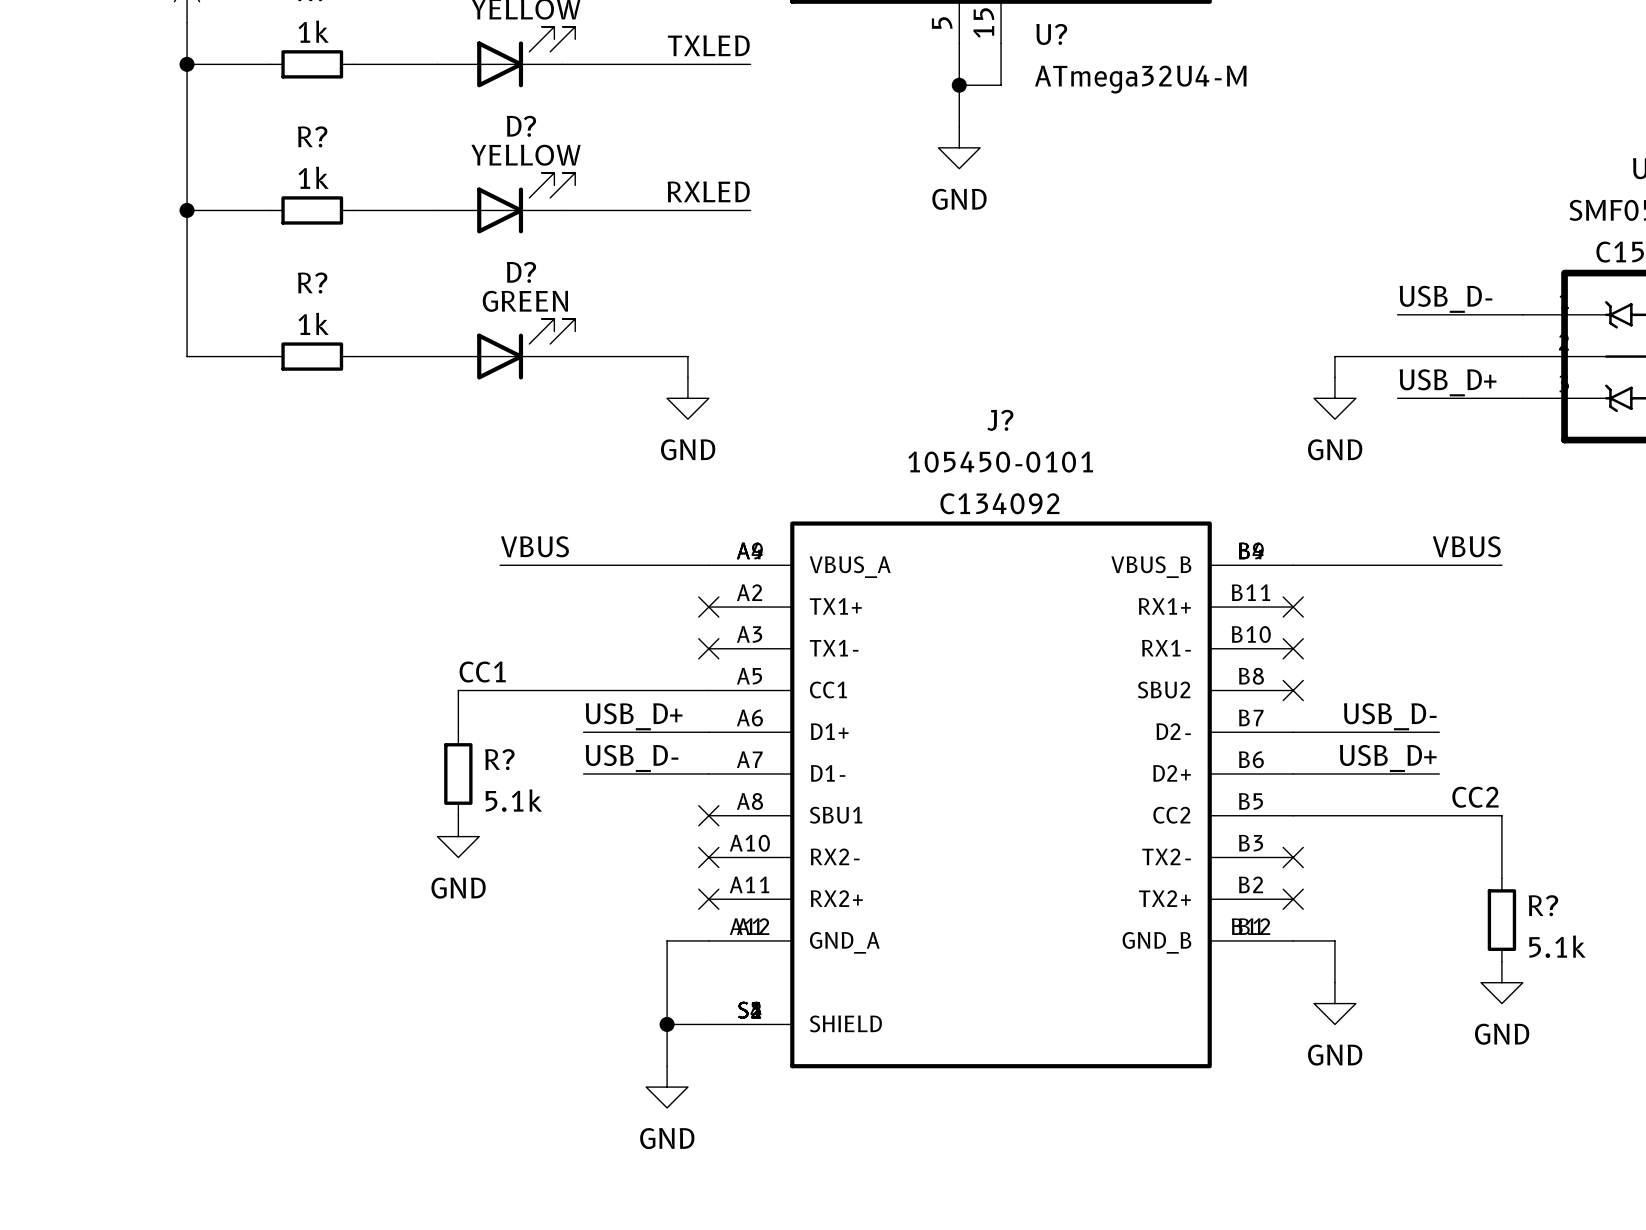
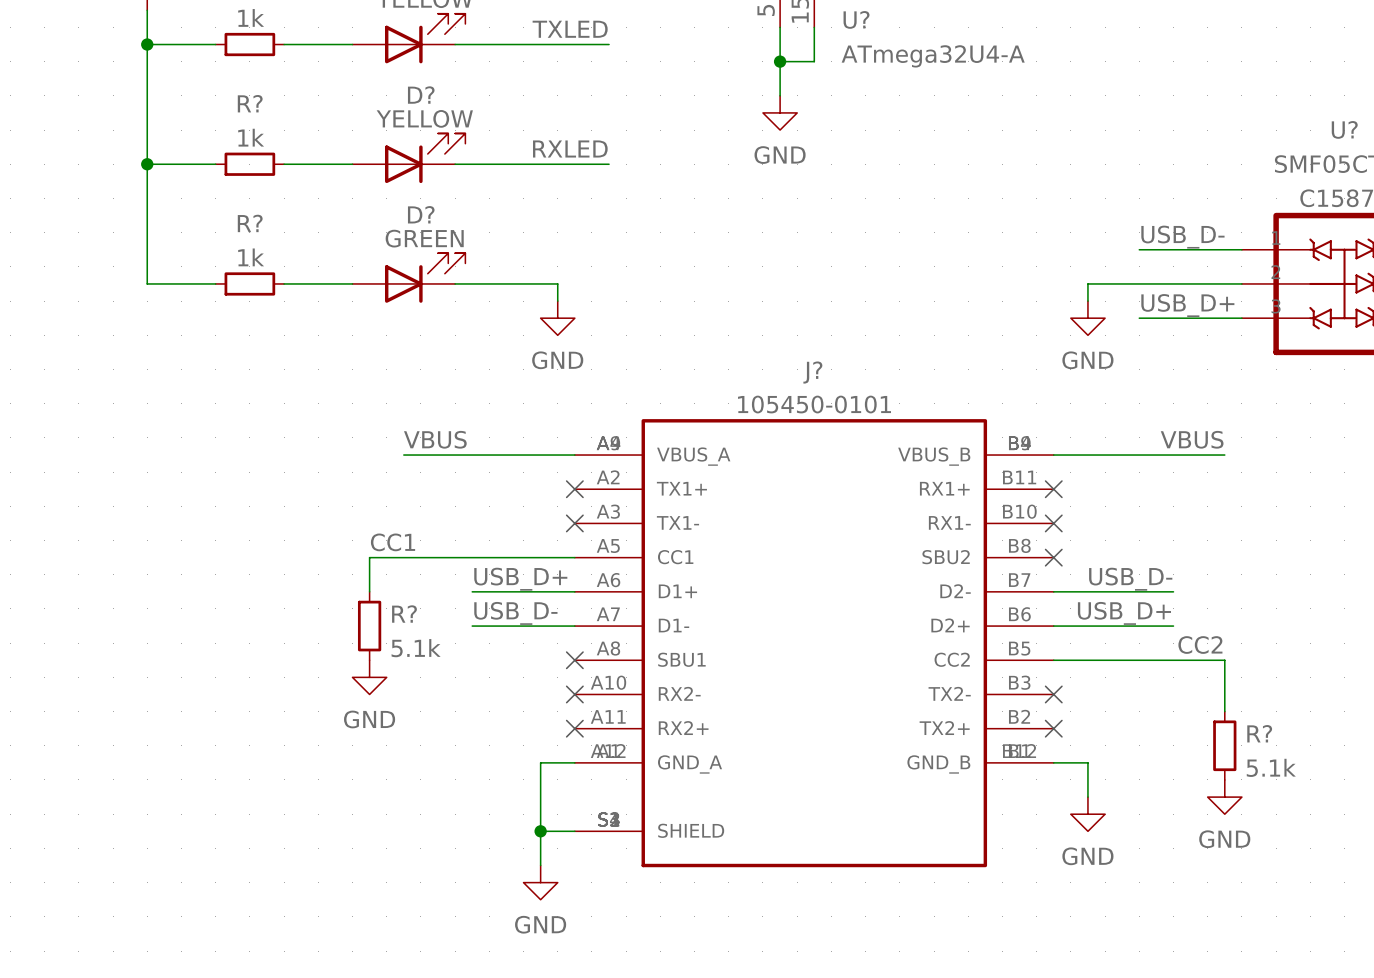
U? value: ATmega32U4-M (1140, 79) -> ATmega32U4-A (933, 56)
J? name position: J? (1000, 420) -> J? (812, 372)
J? value position: 105450-0101 (1000, 462) -> 105450-0101 (814, 404)
J? text: C134092 (999, 503) -> none

